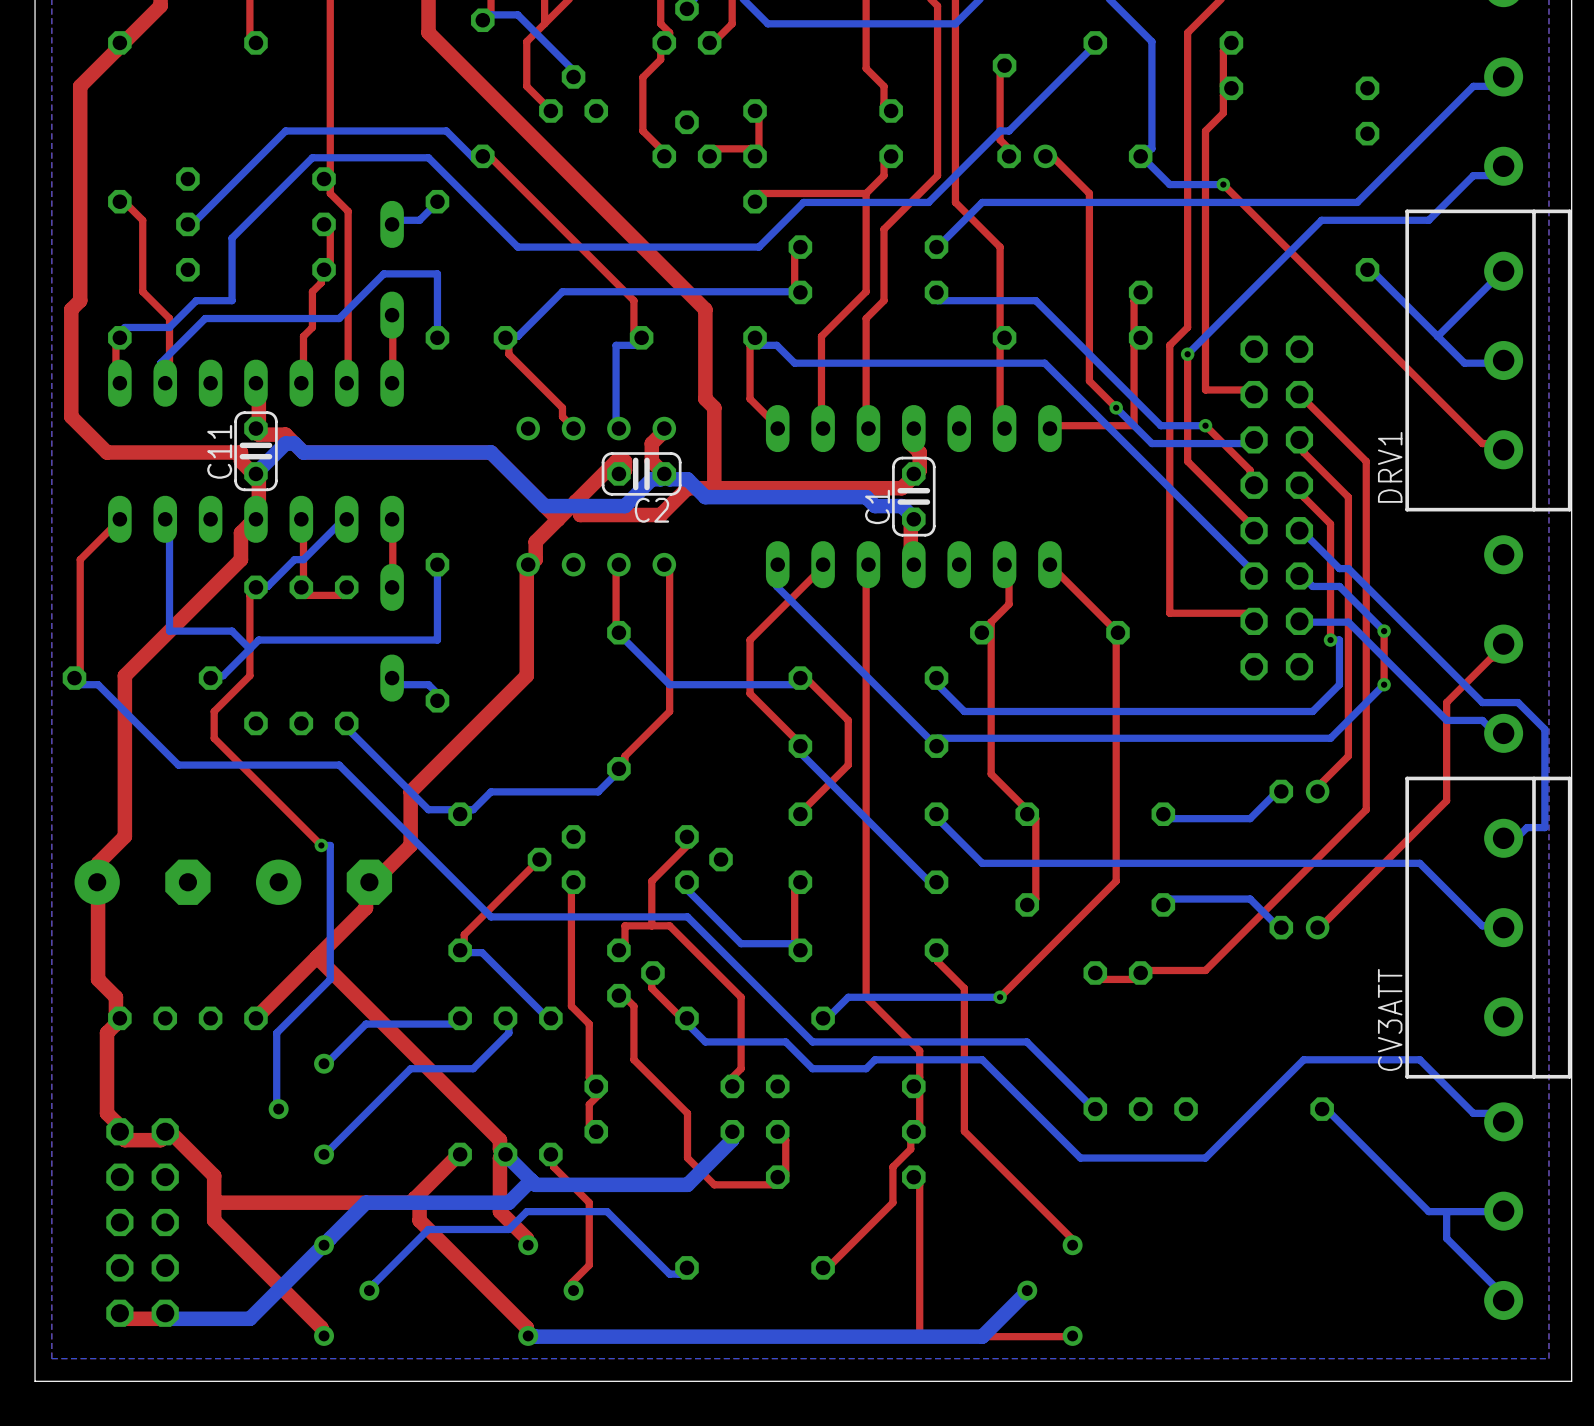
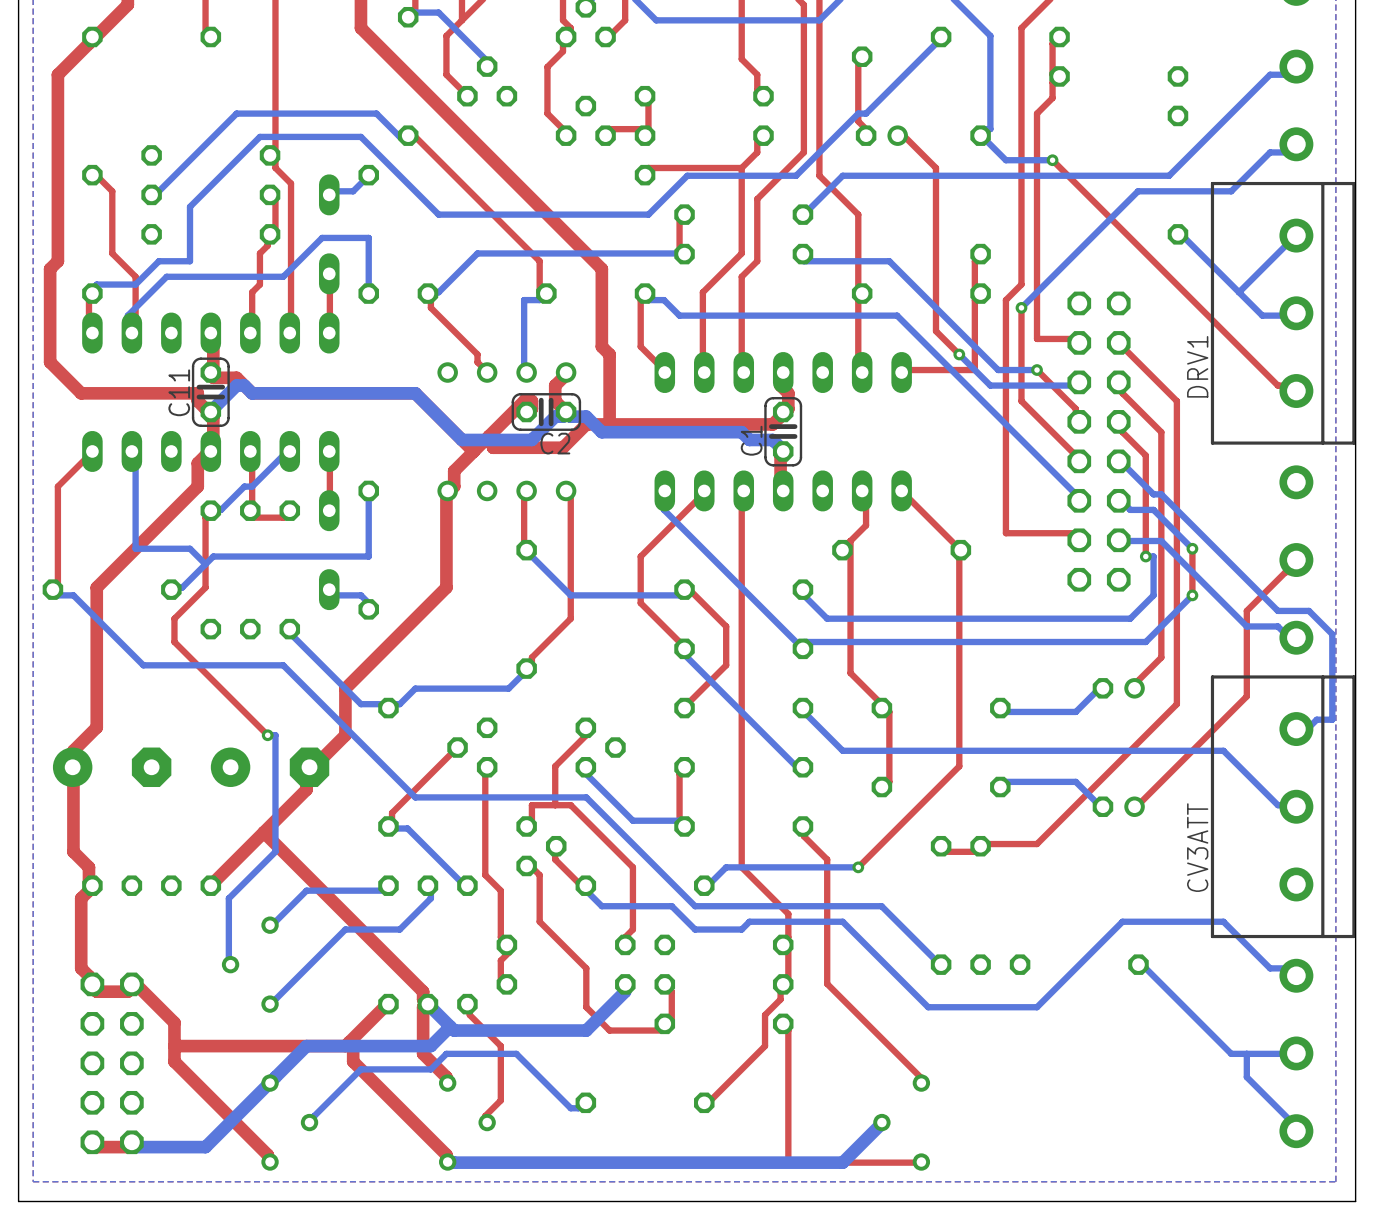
DRV1 name position: DRV1 (1390, 467) -> DRV1 (1197, 366)
CV3ATT name position: CV3ATT (1390, 1019) -> CV3ATT (1197, 847)

